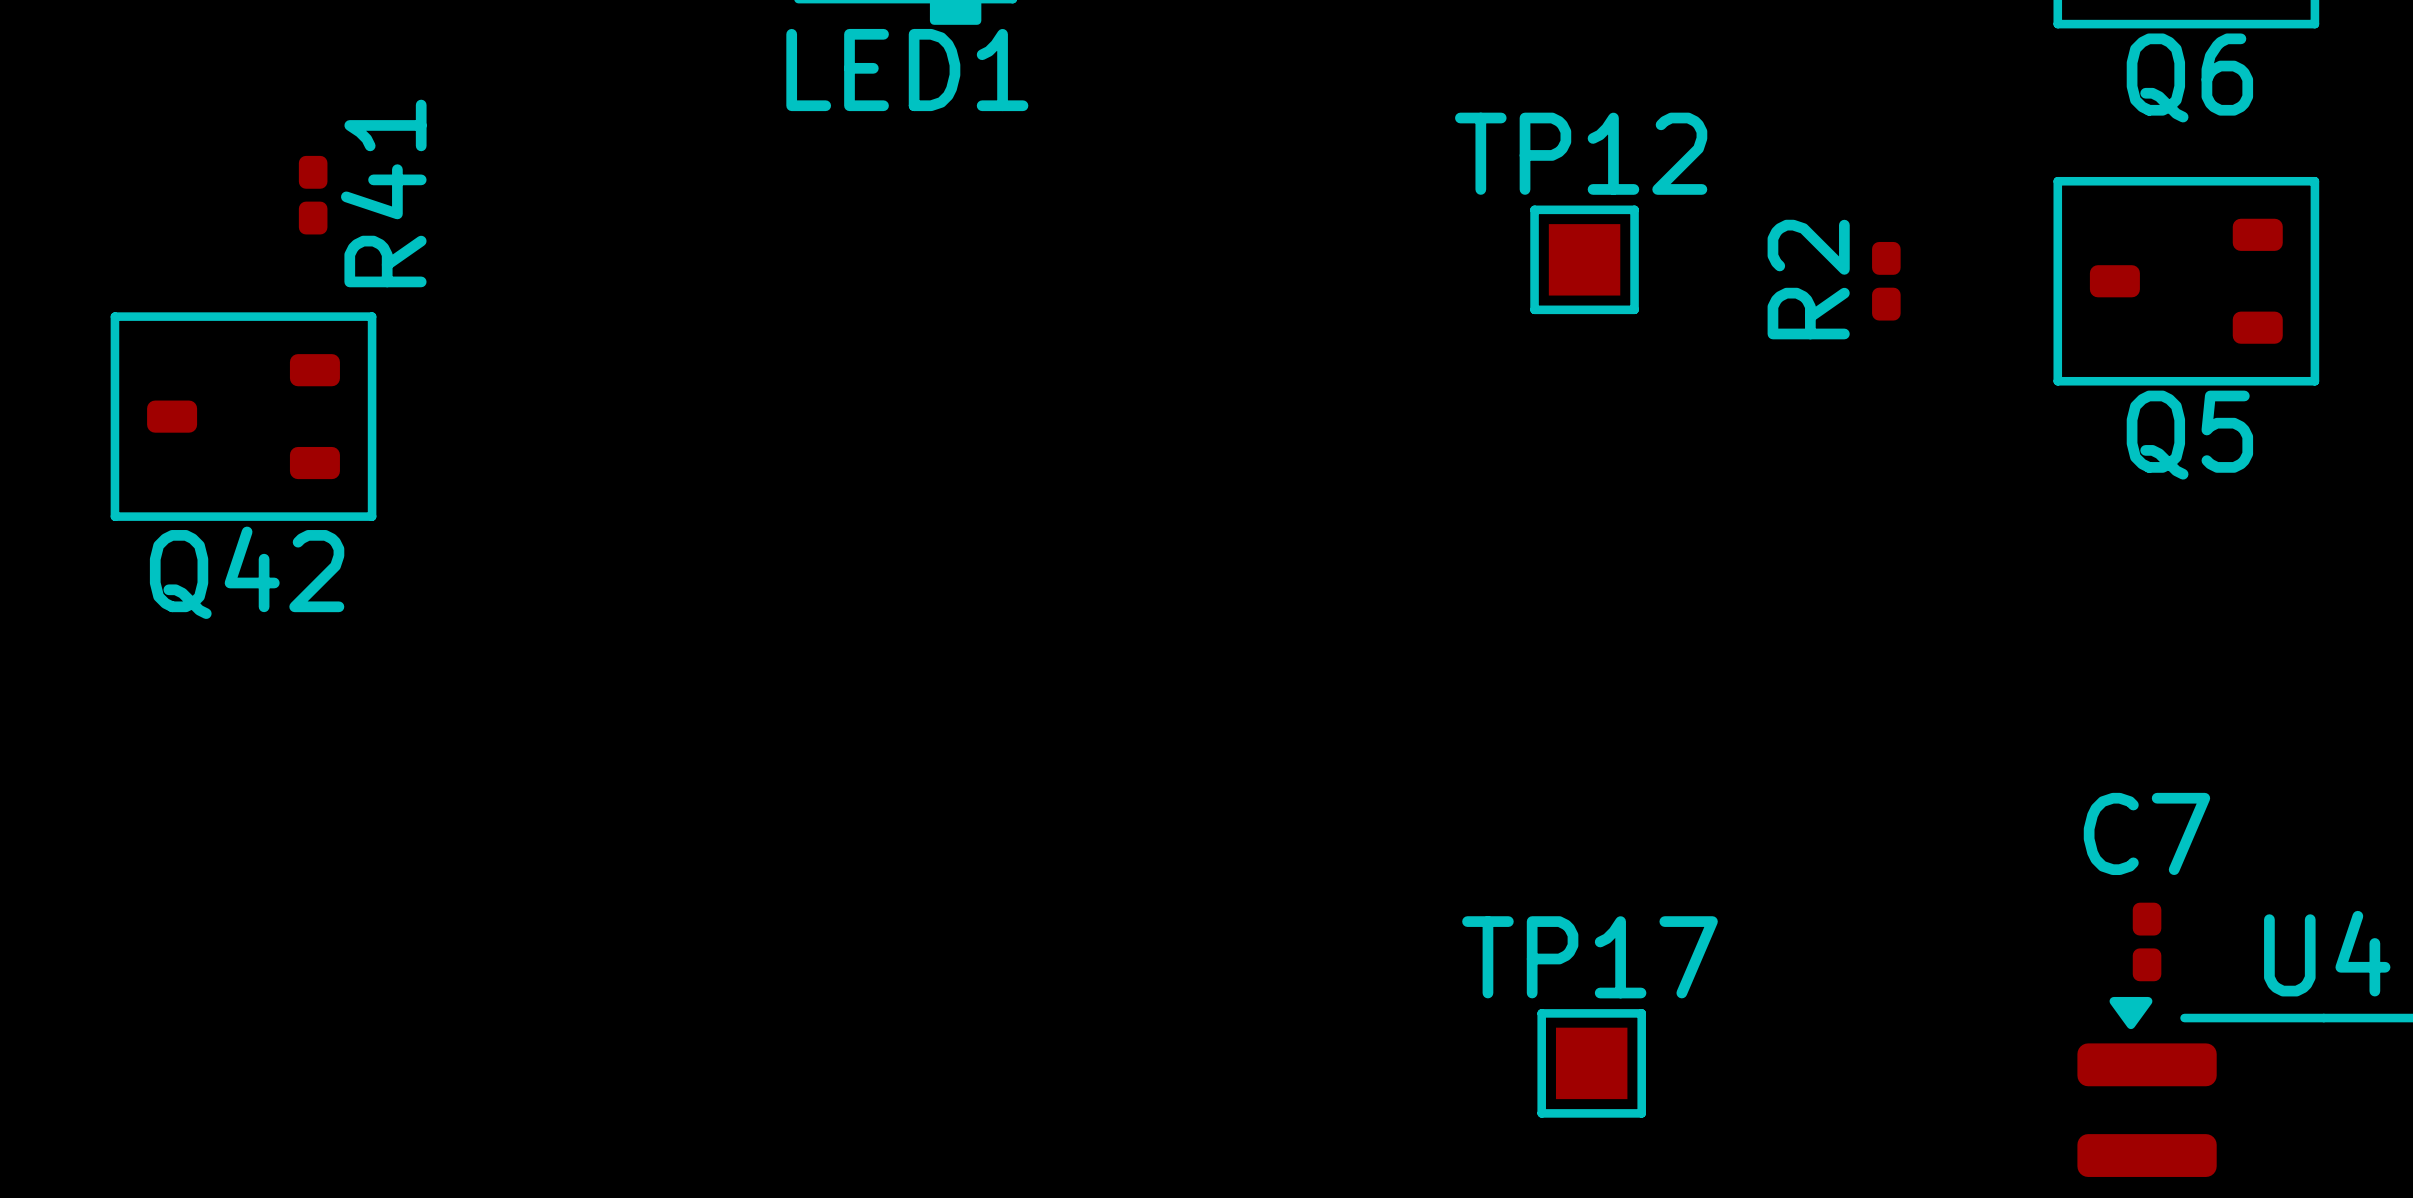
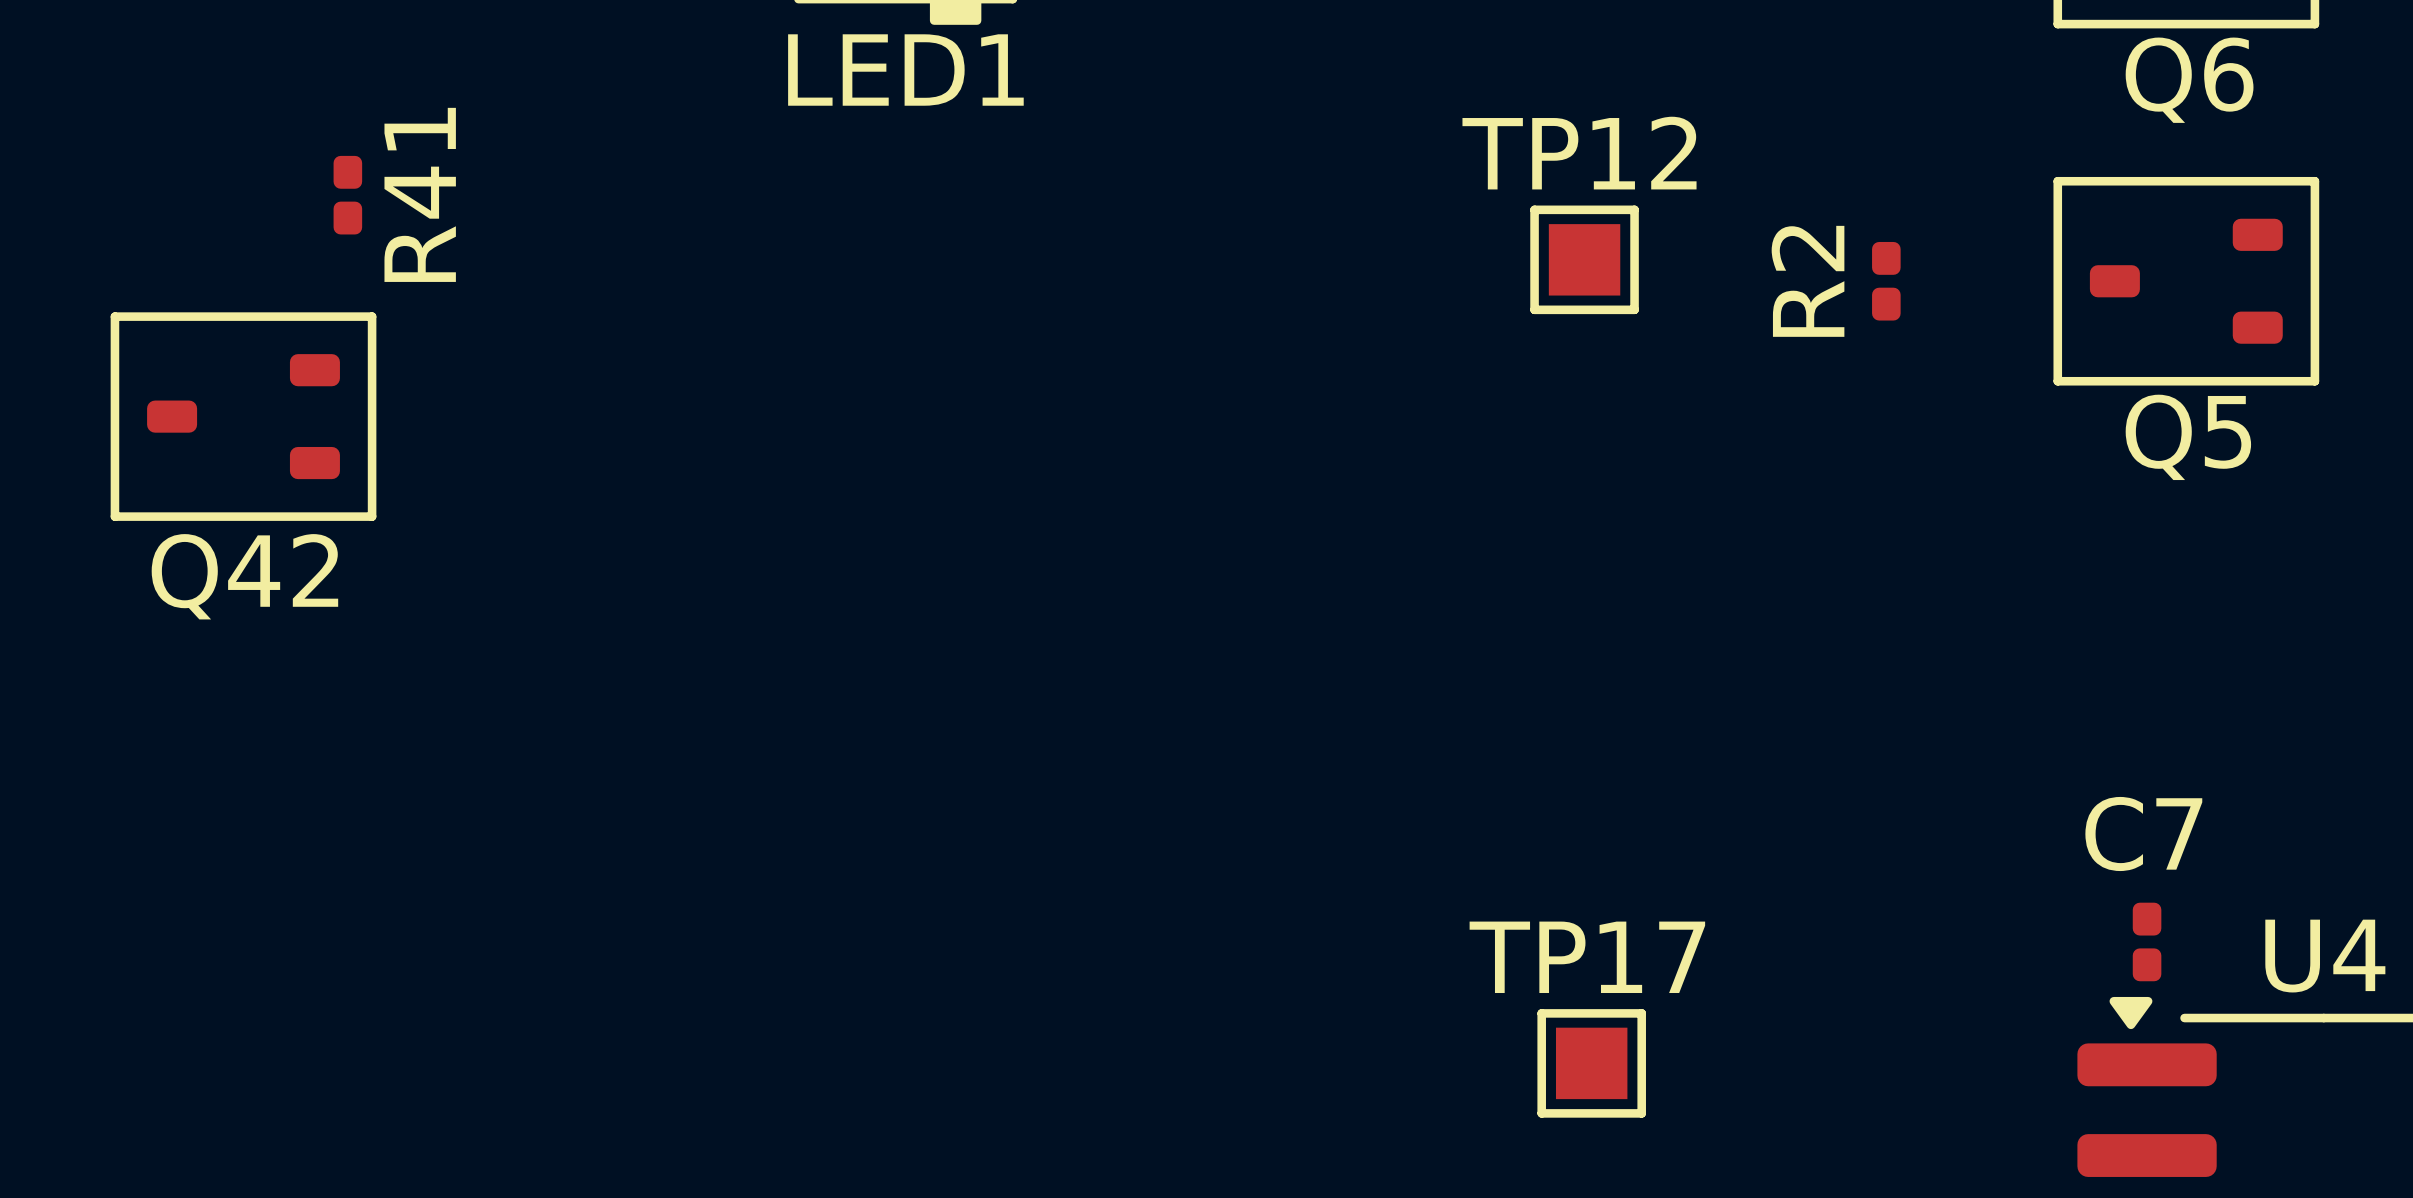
R41 position: (313, 195) -> (347, 195)

